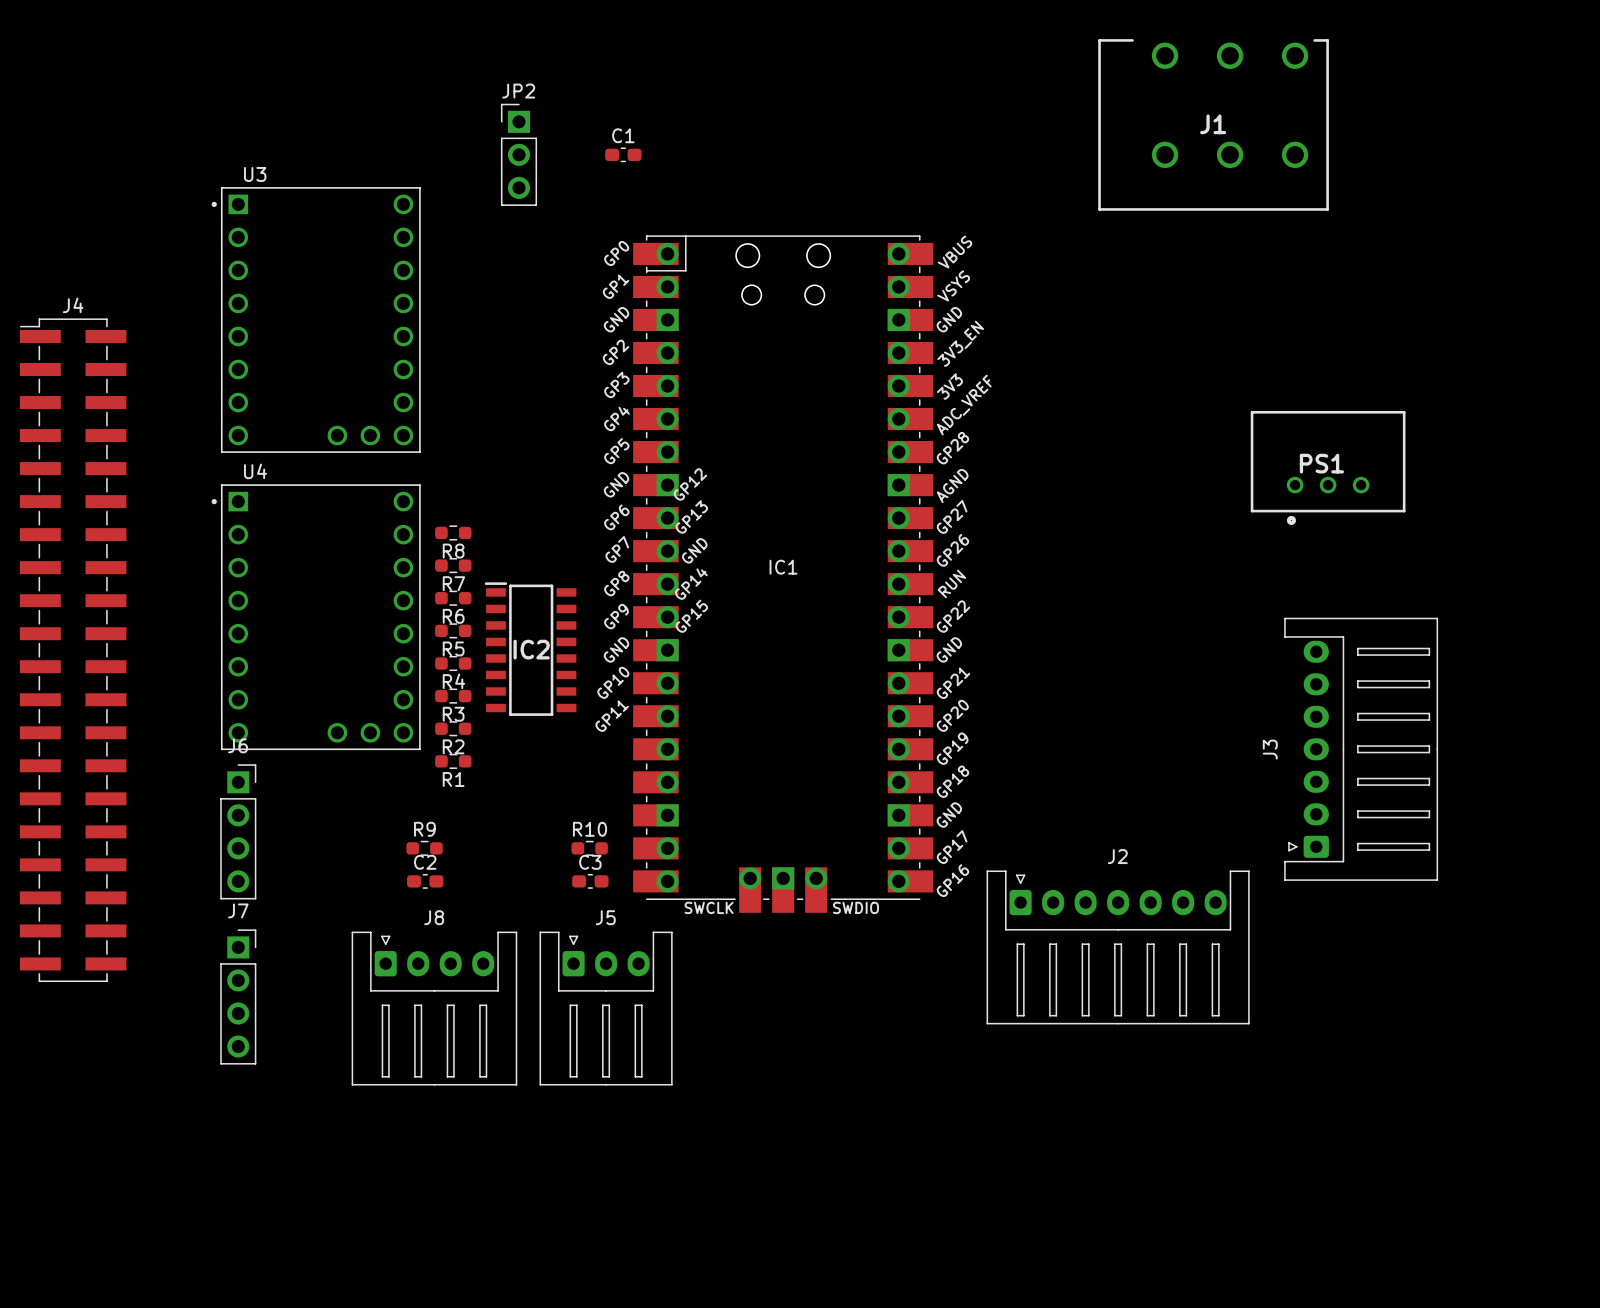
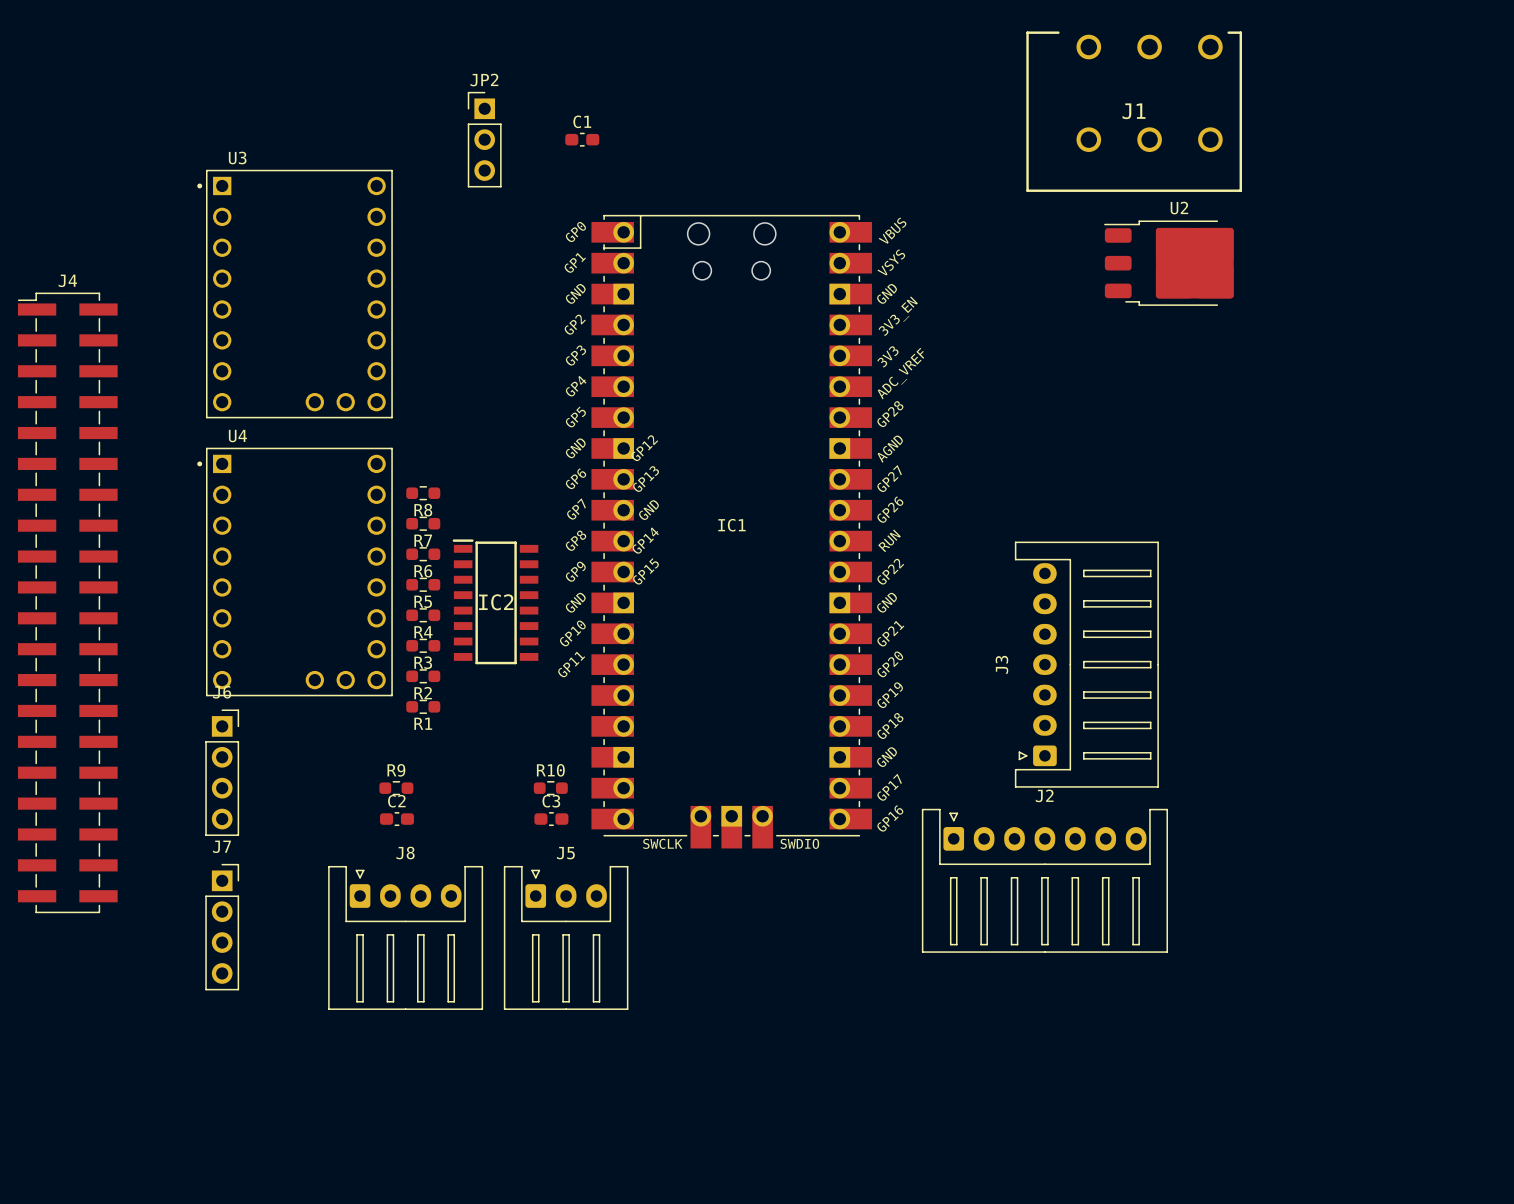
U2: none -> (1168, 263)
PS1: (1328, 467) -> none
J3 position: (1361, 749) -> (1086, 664)

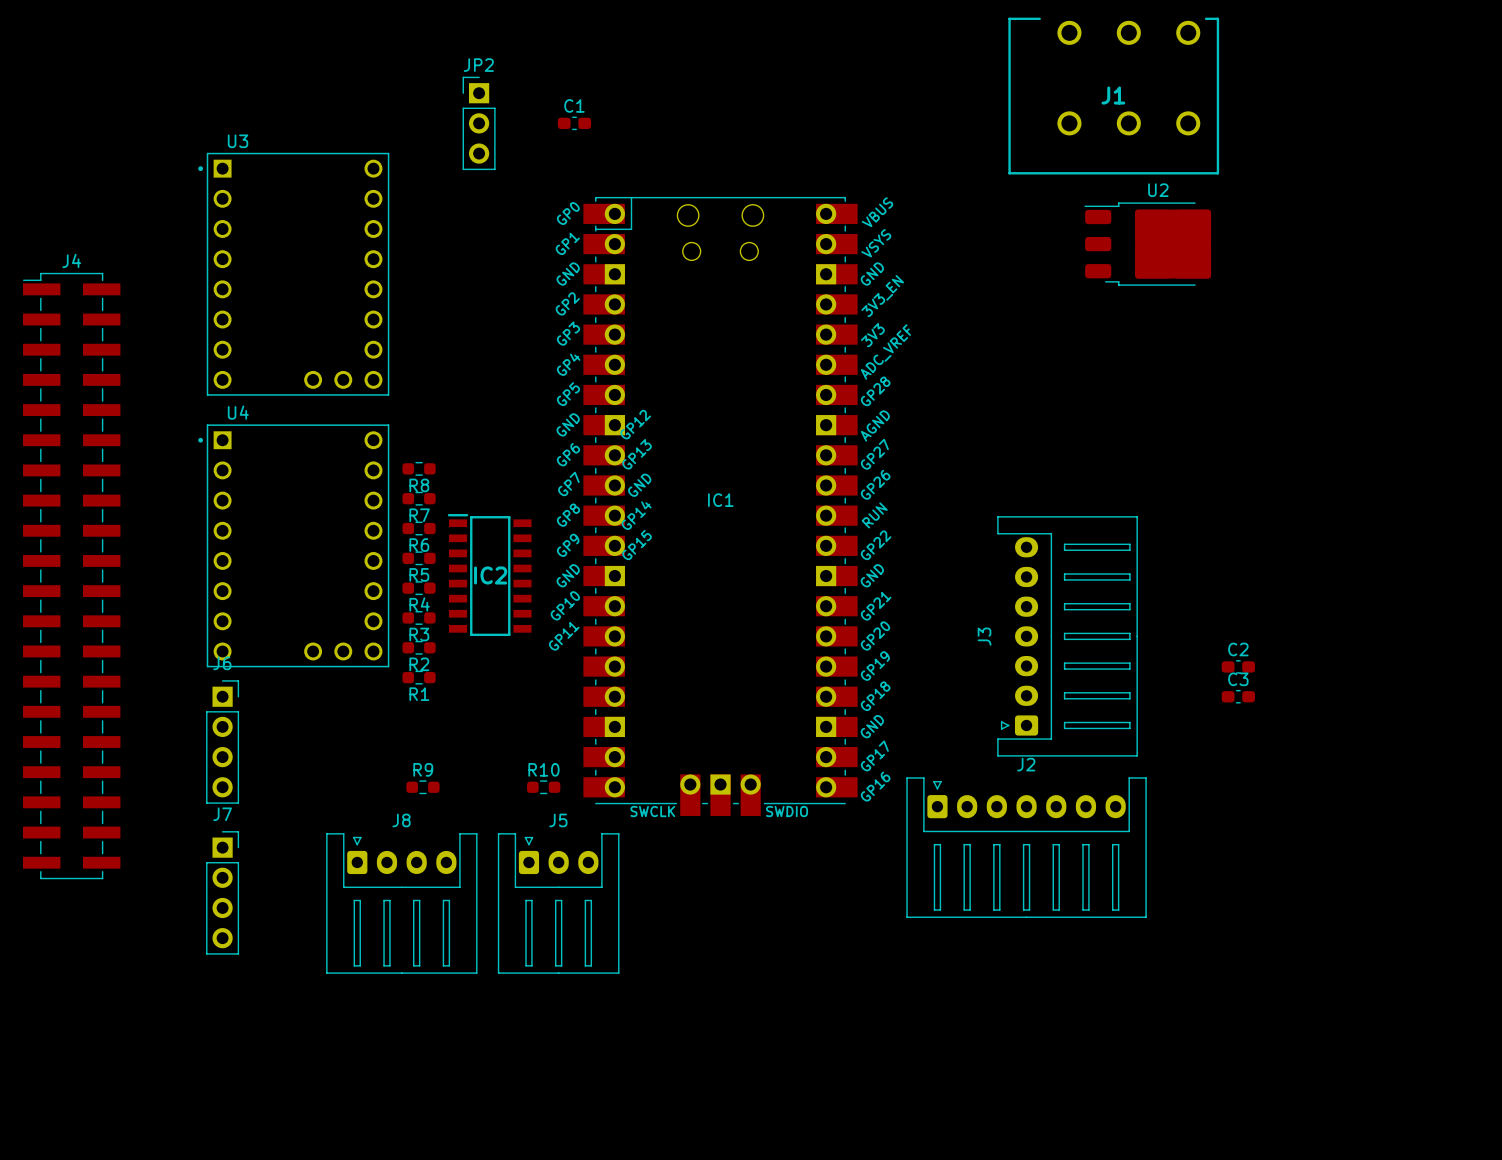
R9 position: (396, 788) -> (422, 787)
R10 position: (550, 788) -> (543, 787)
C2 position: (397, 819) -> (1238, 666)
C3 position: (551, 819) -> (1238, 696)

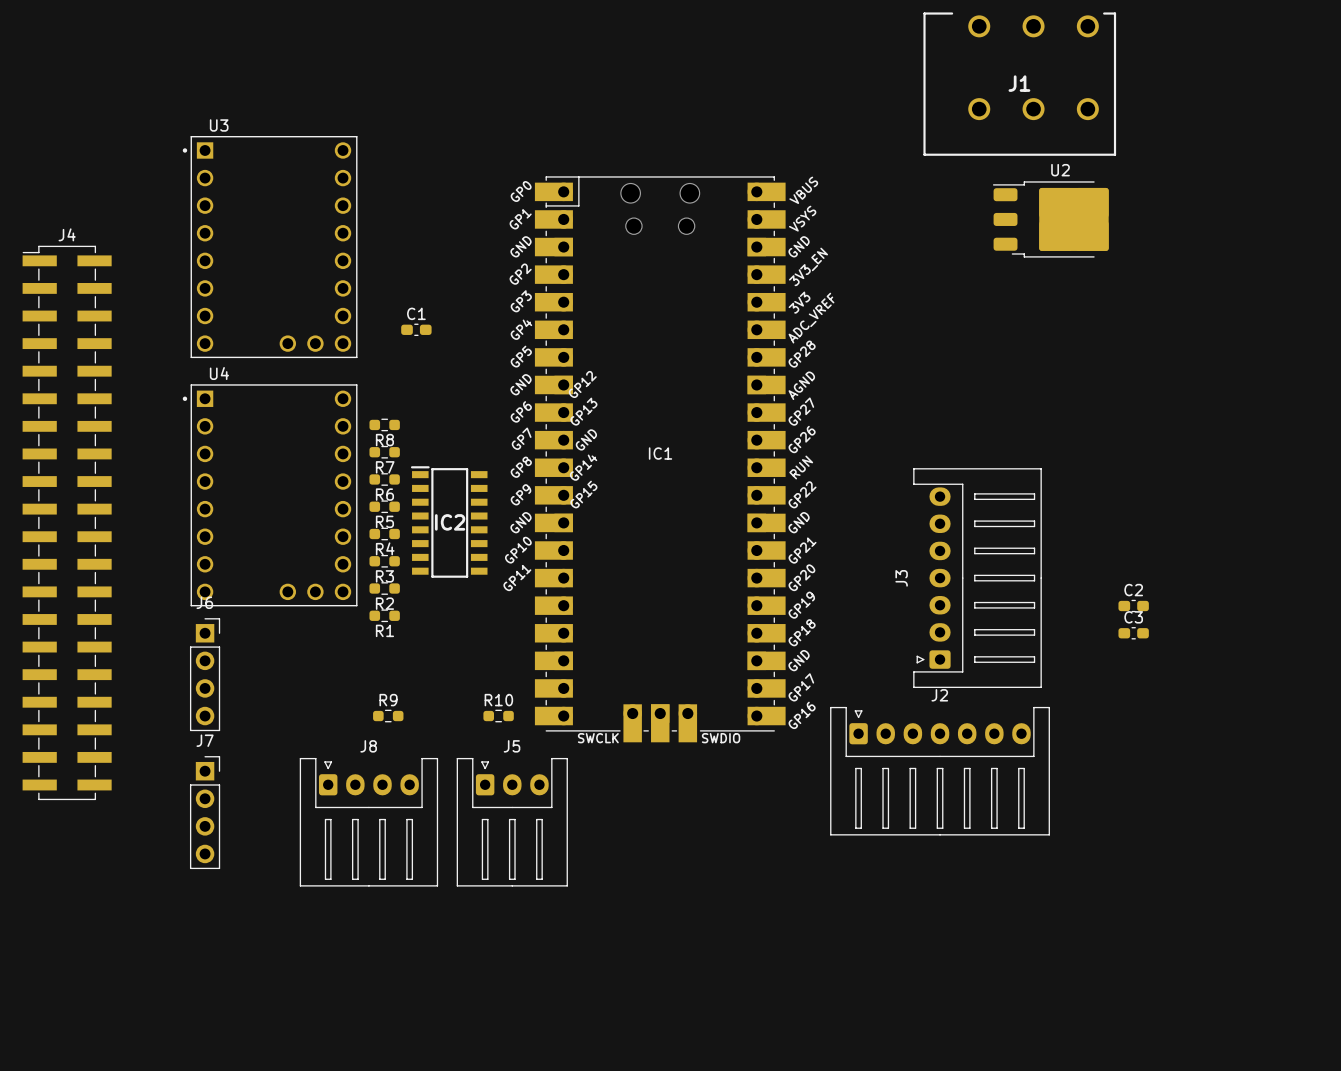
JP2: (479, 123) -> none
C1 position: (574, 123) -> (416, 329)

